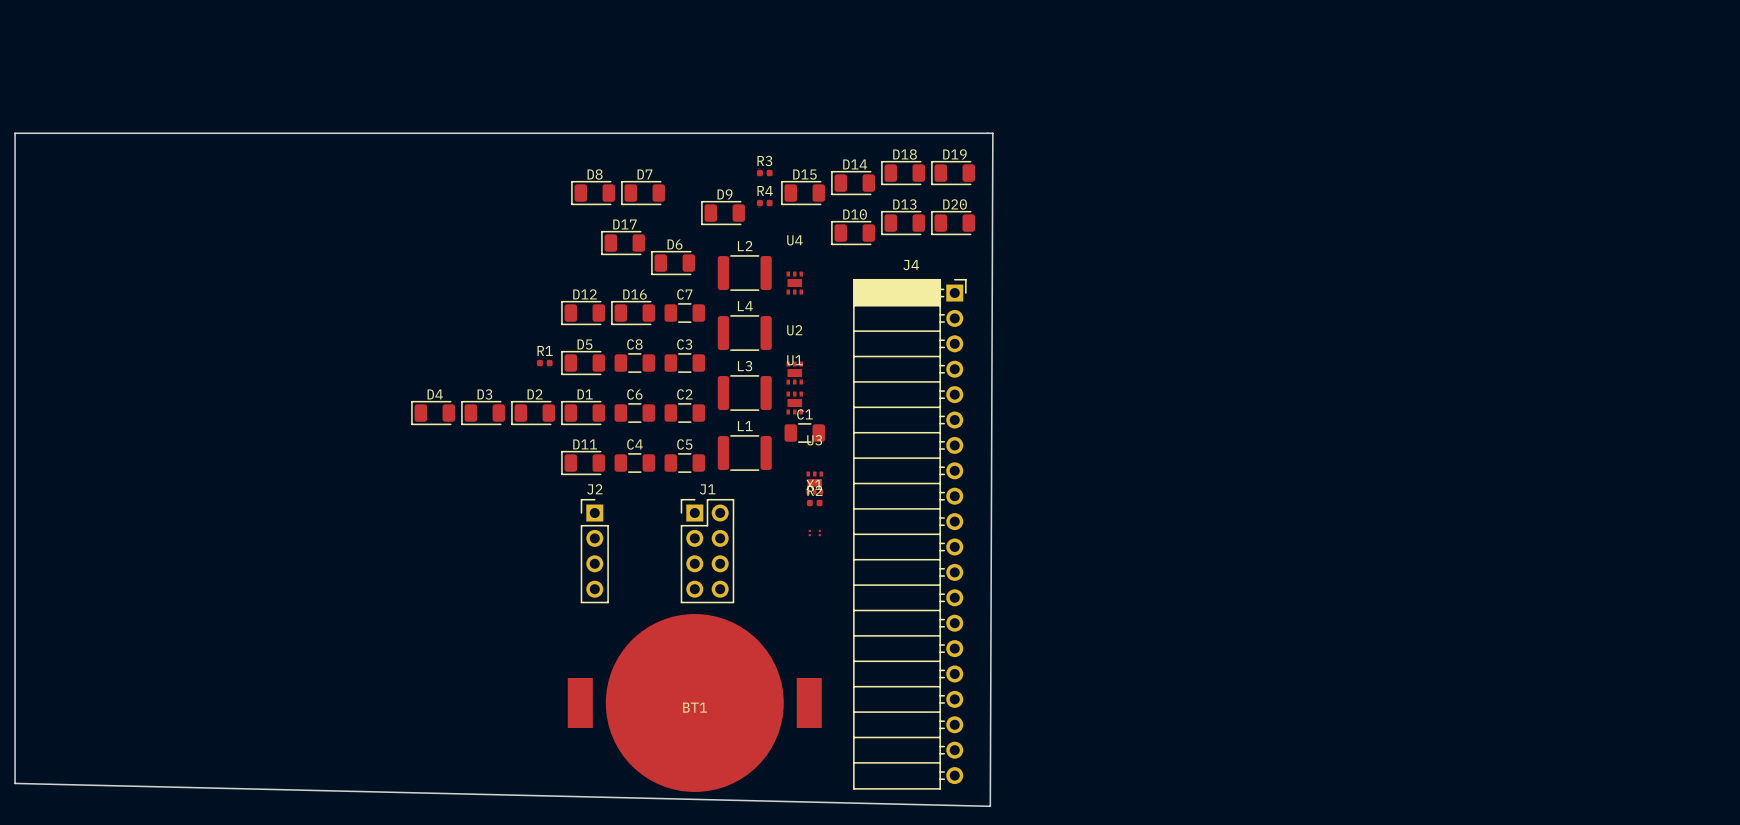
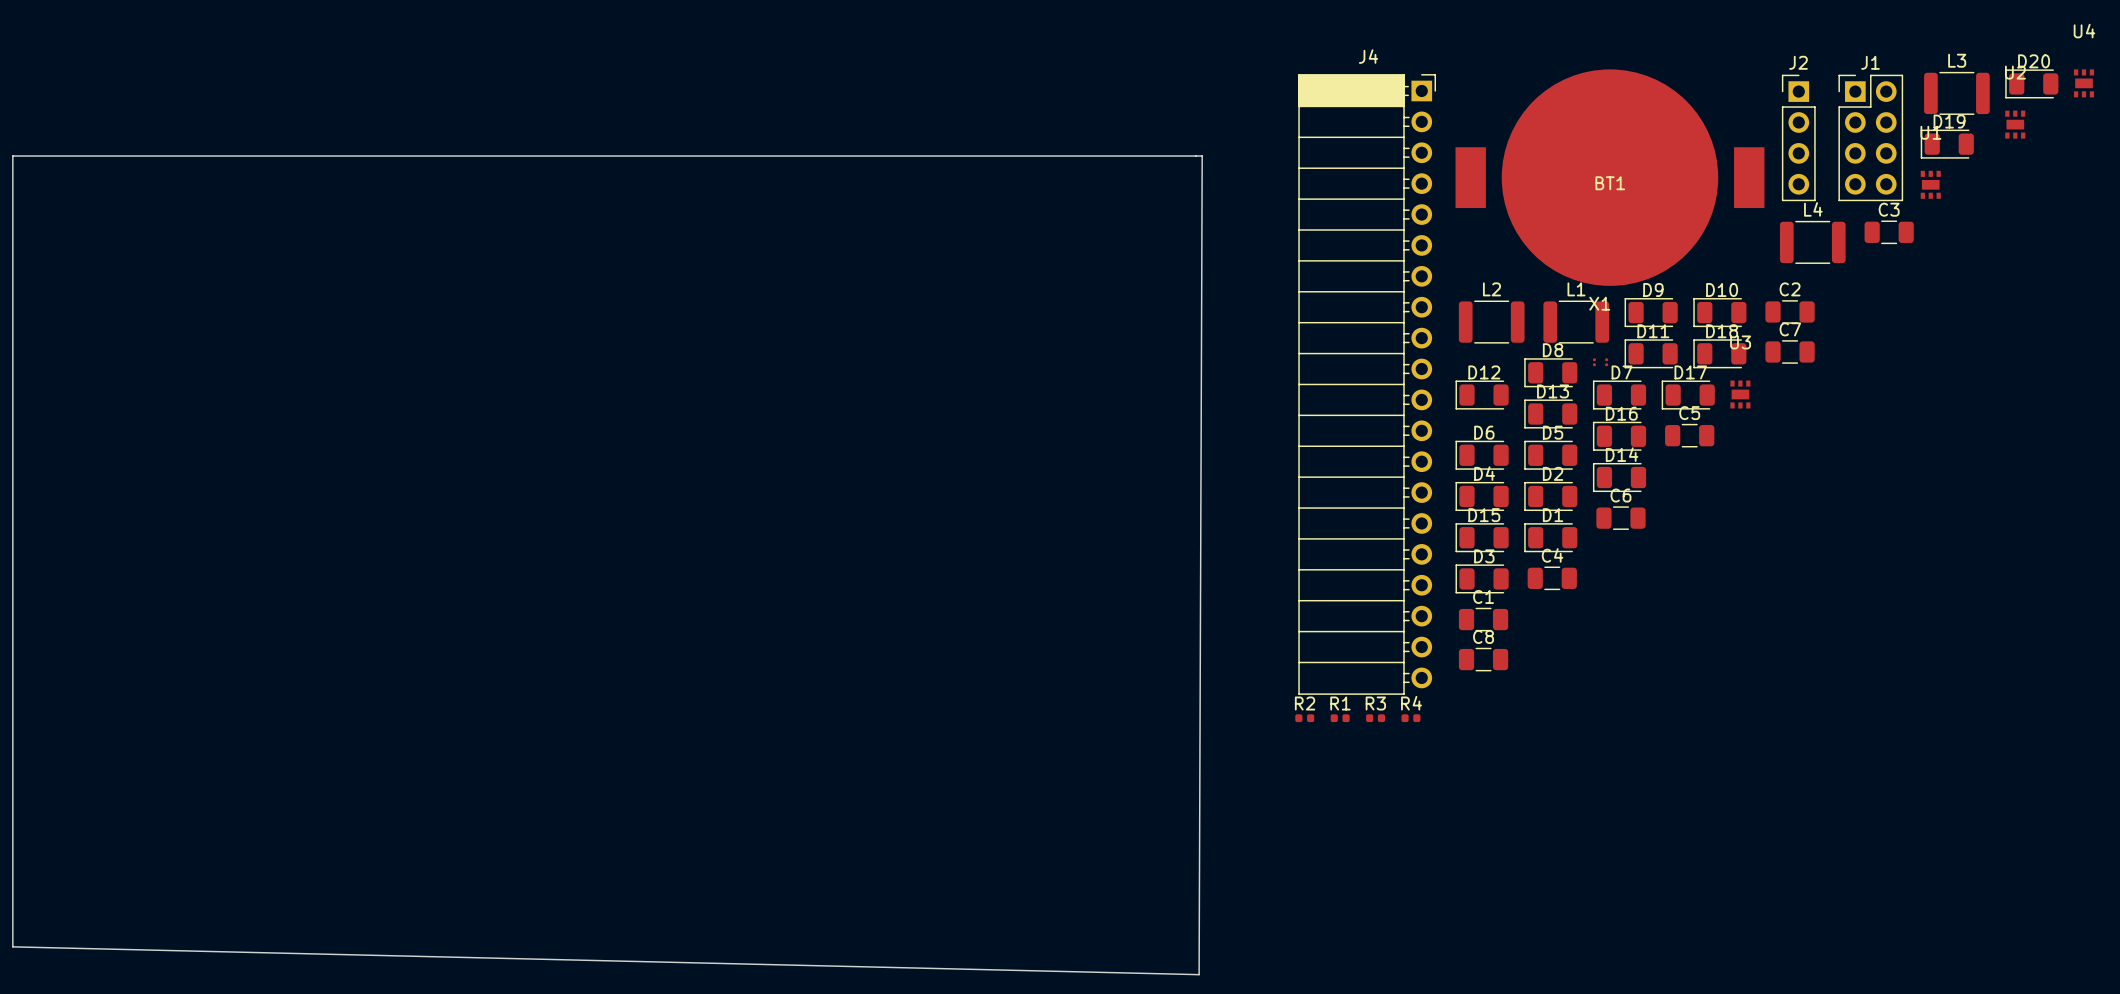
R3 position: (764, 173) -> (1375, 718)
D18 position: (903, 173) -> (1719, 353)
D19 position: (953, 173) -> (1947, 144)
D14 position: (853, 183) -> (1619, 477)
D8 position: (593, 193) -> (1550, 372)
D7 position: (643, 193) -> (1619, 395)
D15 position: (803, 193) -> (1482, 537)
R4 position: (764, 203) -> (1410, 718)
D9 position: (723, 213) -> (1651, 312)
D13 position: (903, 223) -> (1550, 414)
D20 position: (953, 223) -> (2031, 83)
D10 position: (853, 233) -> (1719, 312)
D17 position: (623, 243) -> (1688, 395)
D6 position: (673, 263) -> (1482, 455)
L2 position: (744, 273) -> (1491, 322)
U4 position: (794, 283) -> (2084, 83)
D12 position: (583, 313) -> (1482, 395)
D16 position: (633, 313) -> (1619, 436)
C7 position: (684, 313) -> (1790, 351)
L4 position: (744, 333) -> (1812, 242)
R1 position: (544, 363) -> (1340, 718)
D5 position: (583, 363) -> (1550, 455)
C8 position: (634, 363) -> (1483, 659)
C3 position: (684, 363) -> (1889, 232)
U2 position: (794, 373) -> (2015, 124)
L3 position: (744, 393) -> (1956, 93)
U1 position: (794, 403) -> (1930, 184)
D4 position: (433, 413) -> (1482, 496)
D3 position: (483, 413) -> (1482, 578)
D2 position: (533, 413) -> (1550, 496)
D1 position: (583, 413) -> (1550, 537)
C6 position: (634, 413) -> (1620, 518)
C2 position: (684, 413) -> (1790, 311)
C1 position: (804, 433) -> (1483, 619)
L1 position: (744, 453) -> (1576, 322)
D11 position: (583, 463) -> (1651, 353)
C4 position: (634, 463) -> (1552, 578)
C5 position: (684, 463) -> (1689, 435)
U3 position: (814, 483) -> (1740, 394)
R2 position: (814, 503) -> (1304, 718)
X1 position: (814, 533) -> (1600, 362)
J4 position: (909, 534) -> (1367, 384)
J2 position: (594, 551) -> (1798, 137)
J1 position: (707, 551) -> (1870, 137)
BT1 position: (694, 702) -> (1609, 177)

